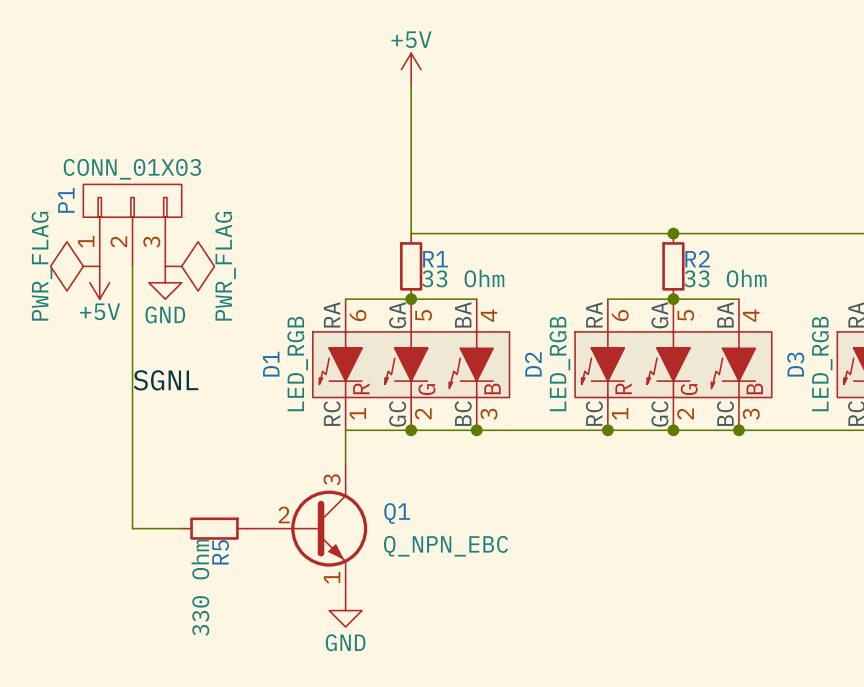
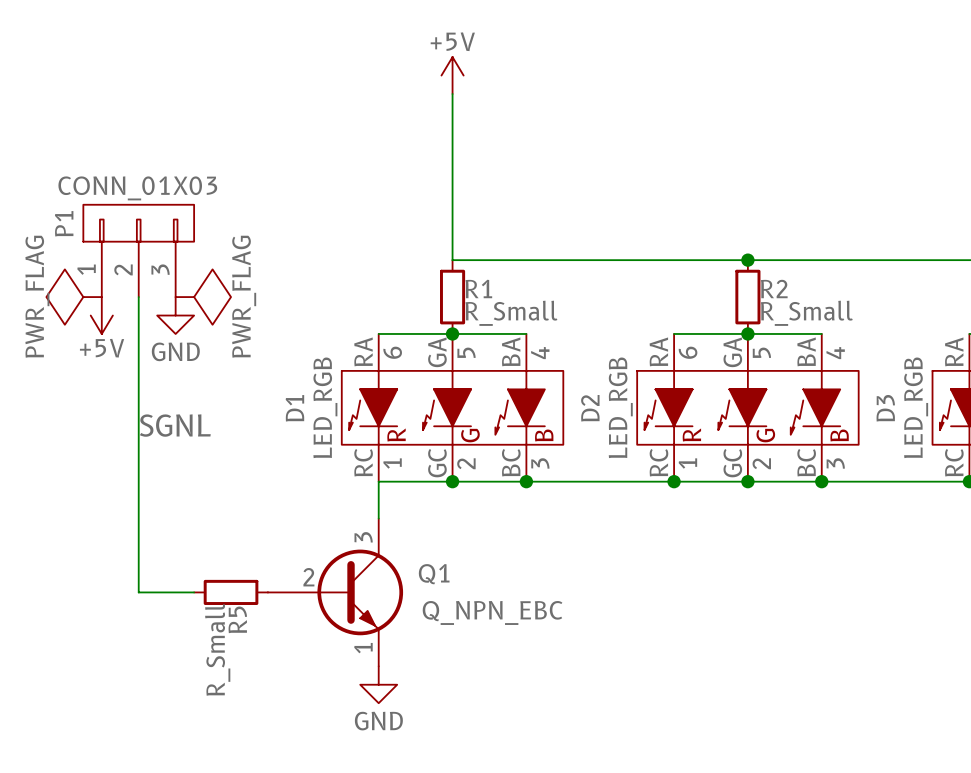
R1 value: 33 Ohm (463, 278) -> R_Small (511, 313)
R2 value: 33 Ohm (725, 278) -> R_Small (806, 313)
R5 value: 330 Ohm (200, 587) -> R_Small (217, 649)

